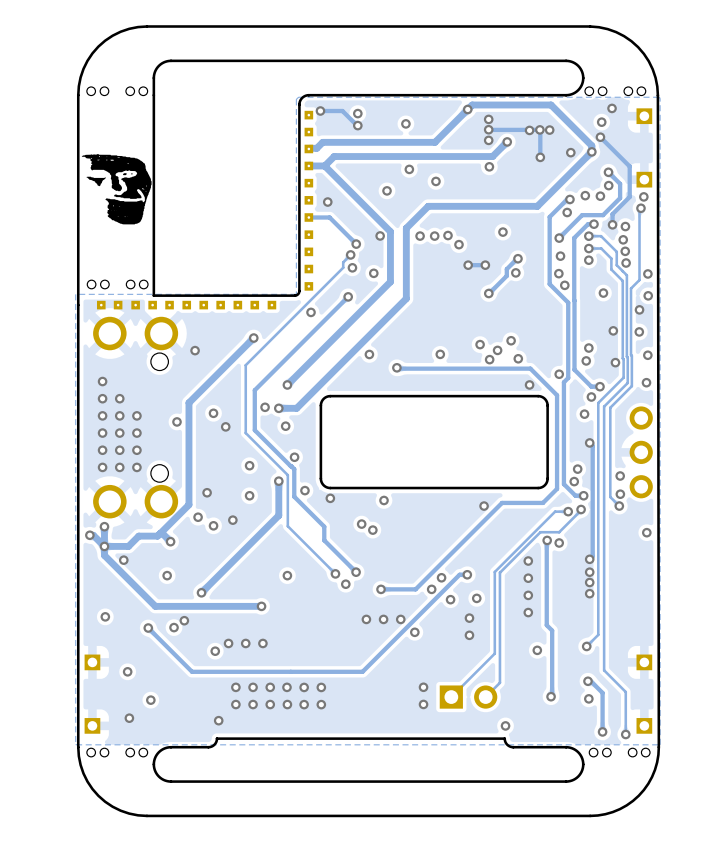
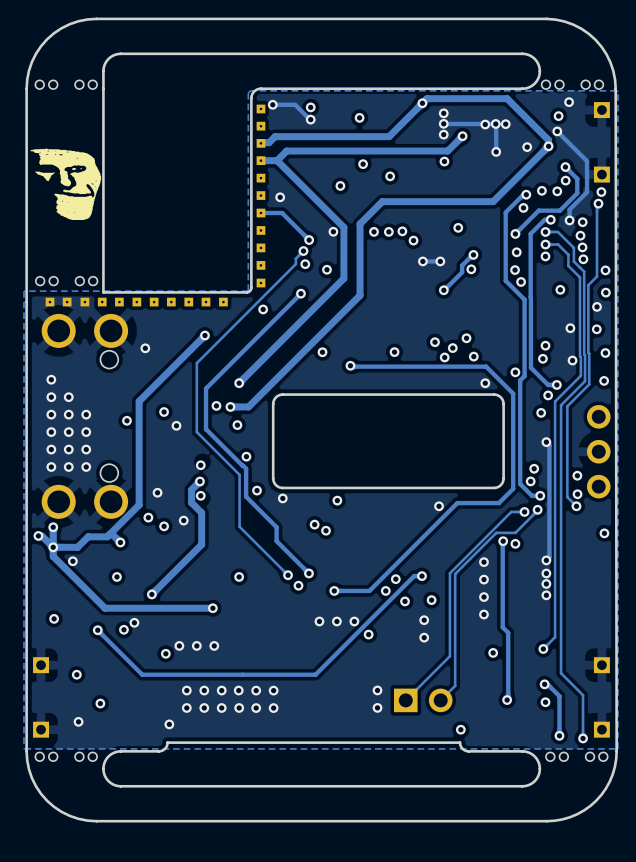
track: (278, 481) (278, 515) (250, 543) -> (199, 481) (191, 489) (191, 502) (201, 512) (201, 544)
via position: (278, 481) -> (199, 481)

